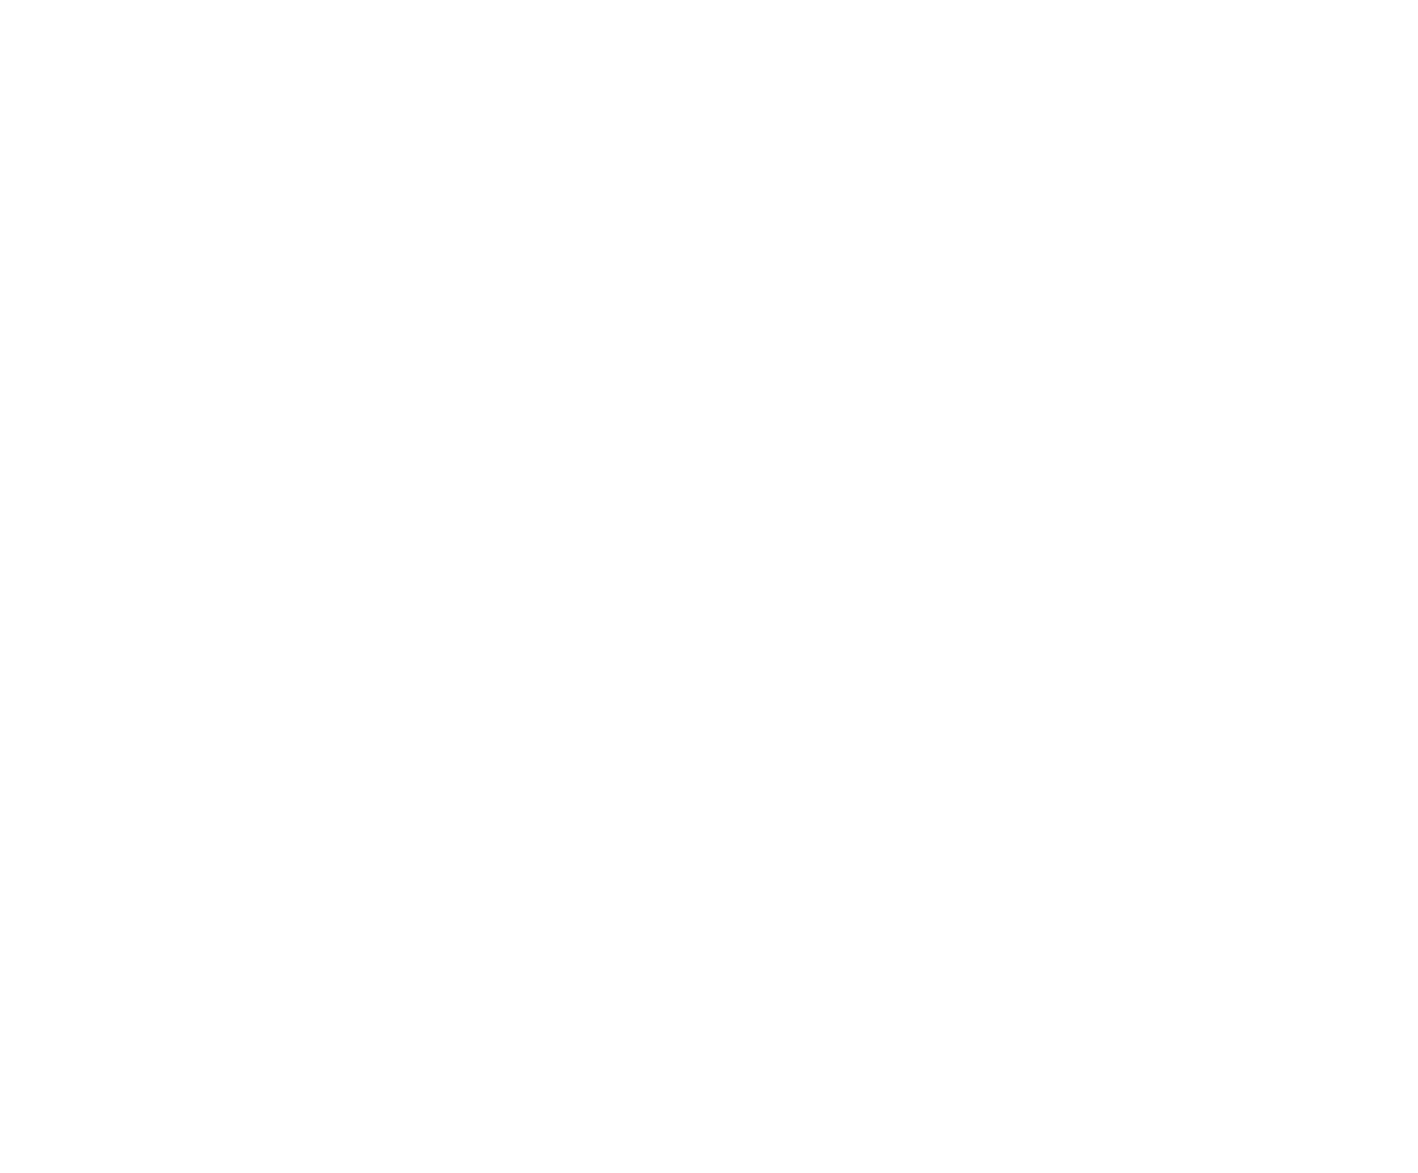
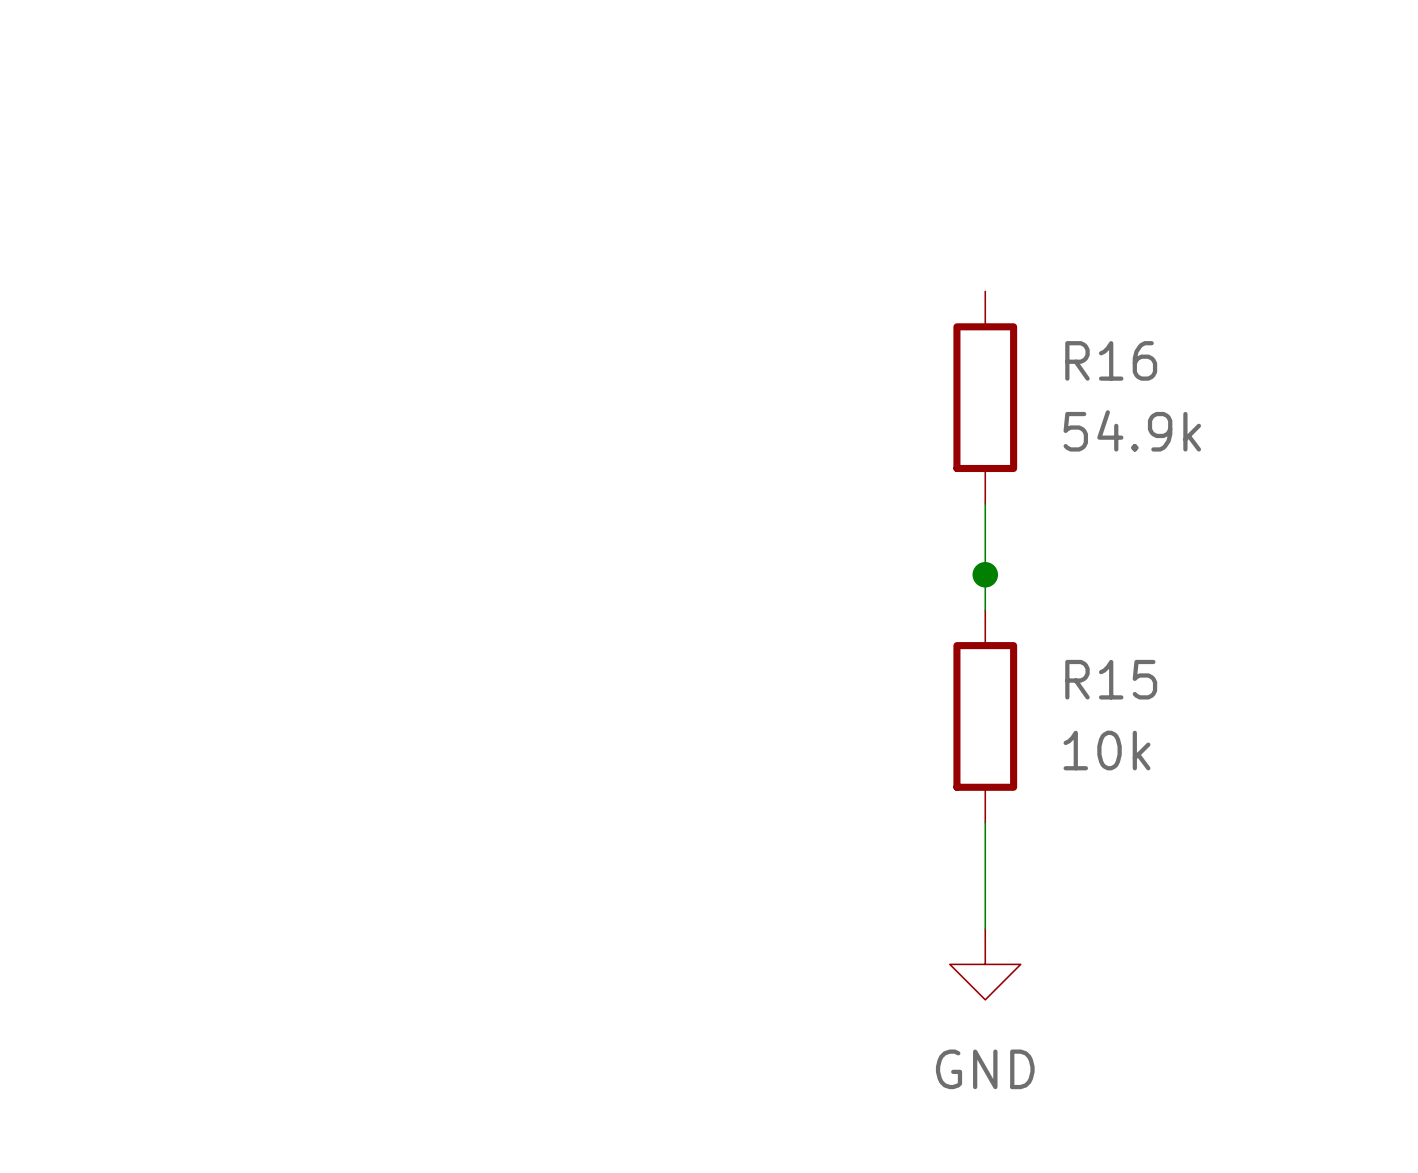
R16: none -> 54.9k (985, 397)
wire: none -> (985, 503) (985, 610)
junction: none -> (985, 574)
R15: none -> 10k (985, 716)
wire: none -> (985, 822) (985, 928)
power symbol: none -> GND (985, 964)

